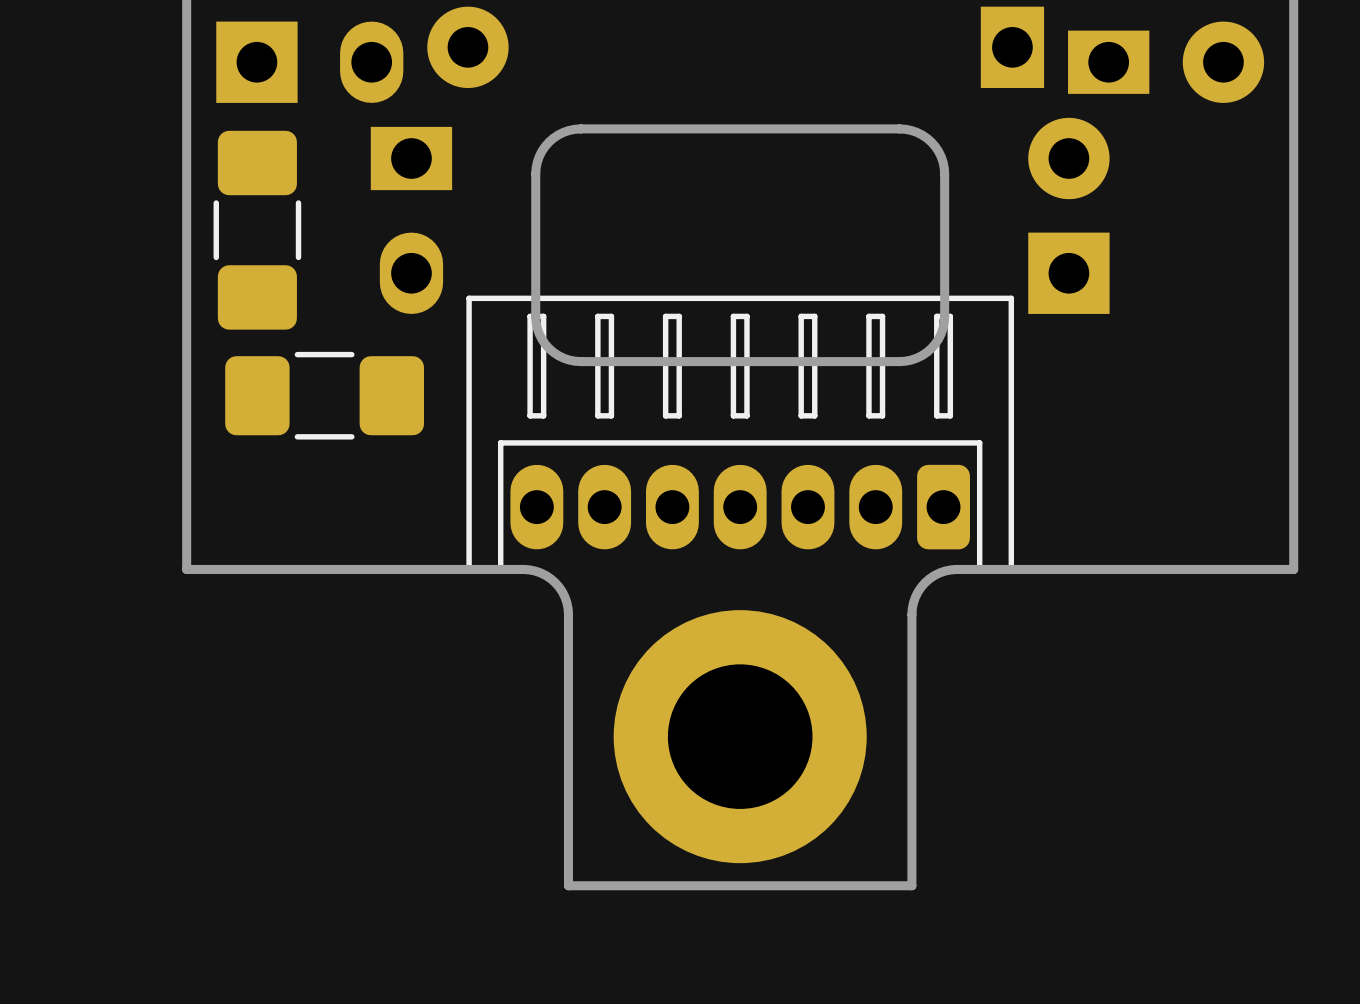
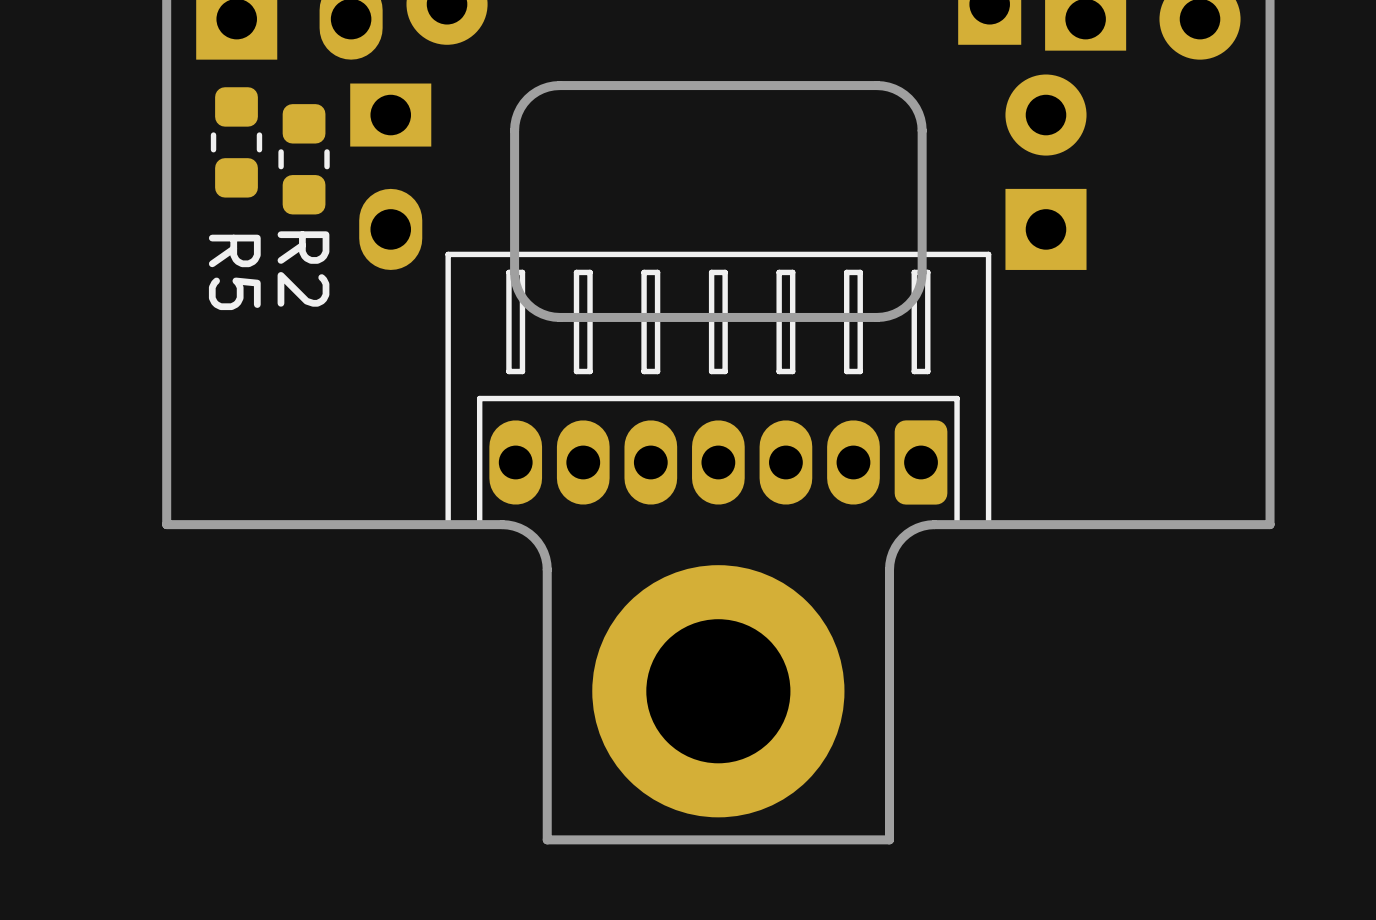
R5: none -> (236, 142)
R2: none -> (304, 159)
part: (257, 230) -> none
part: (324, 395) -> none

